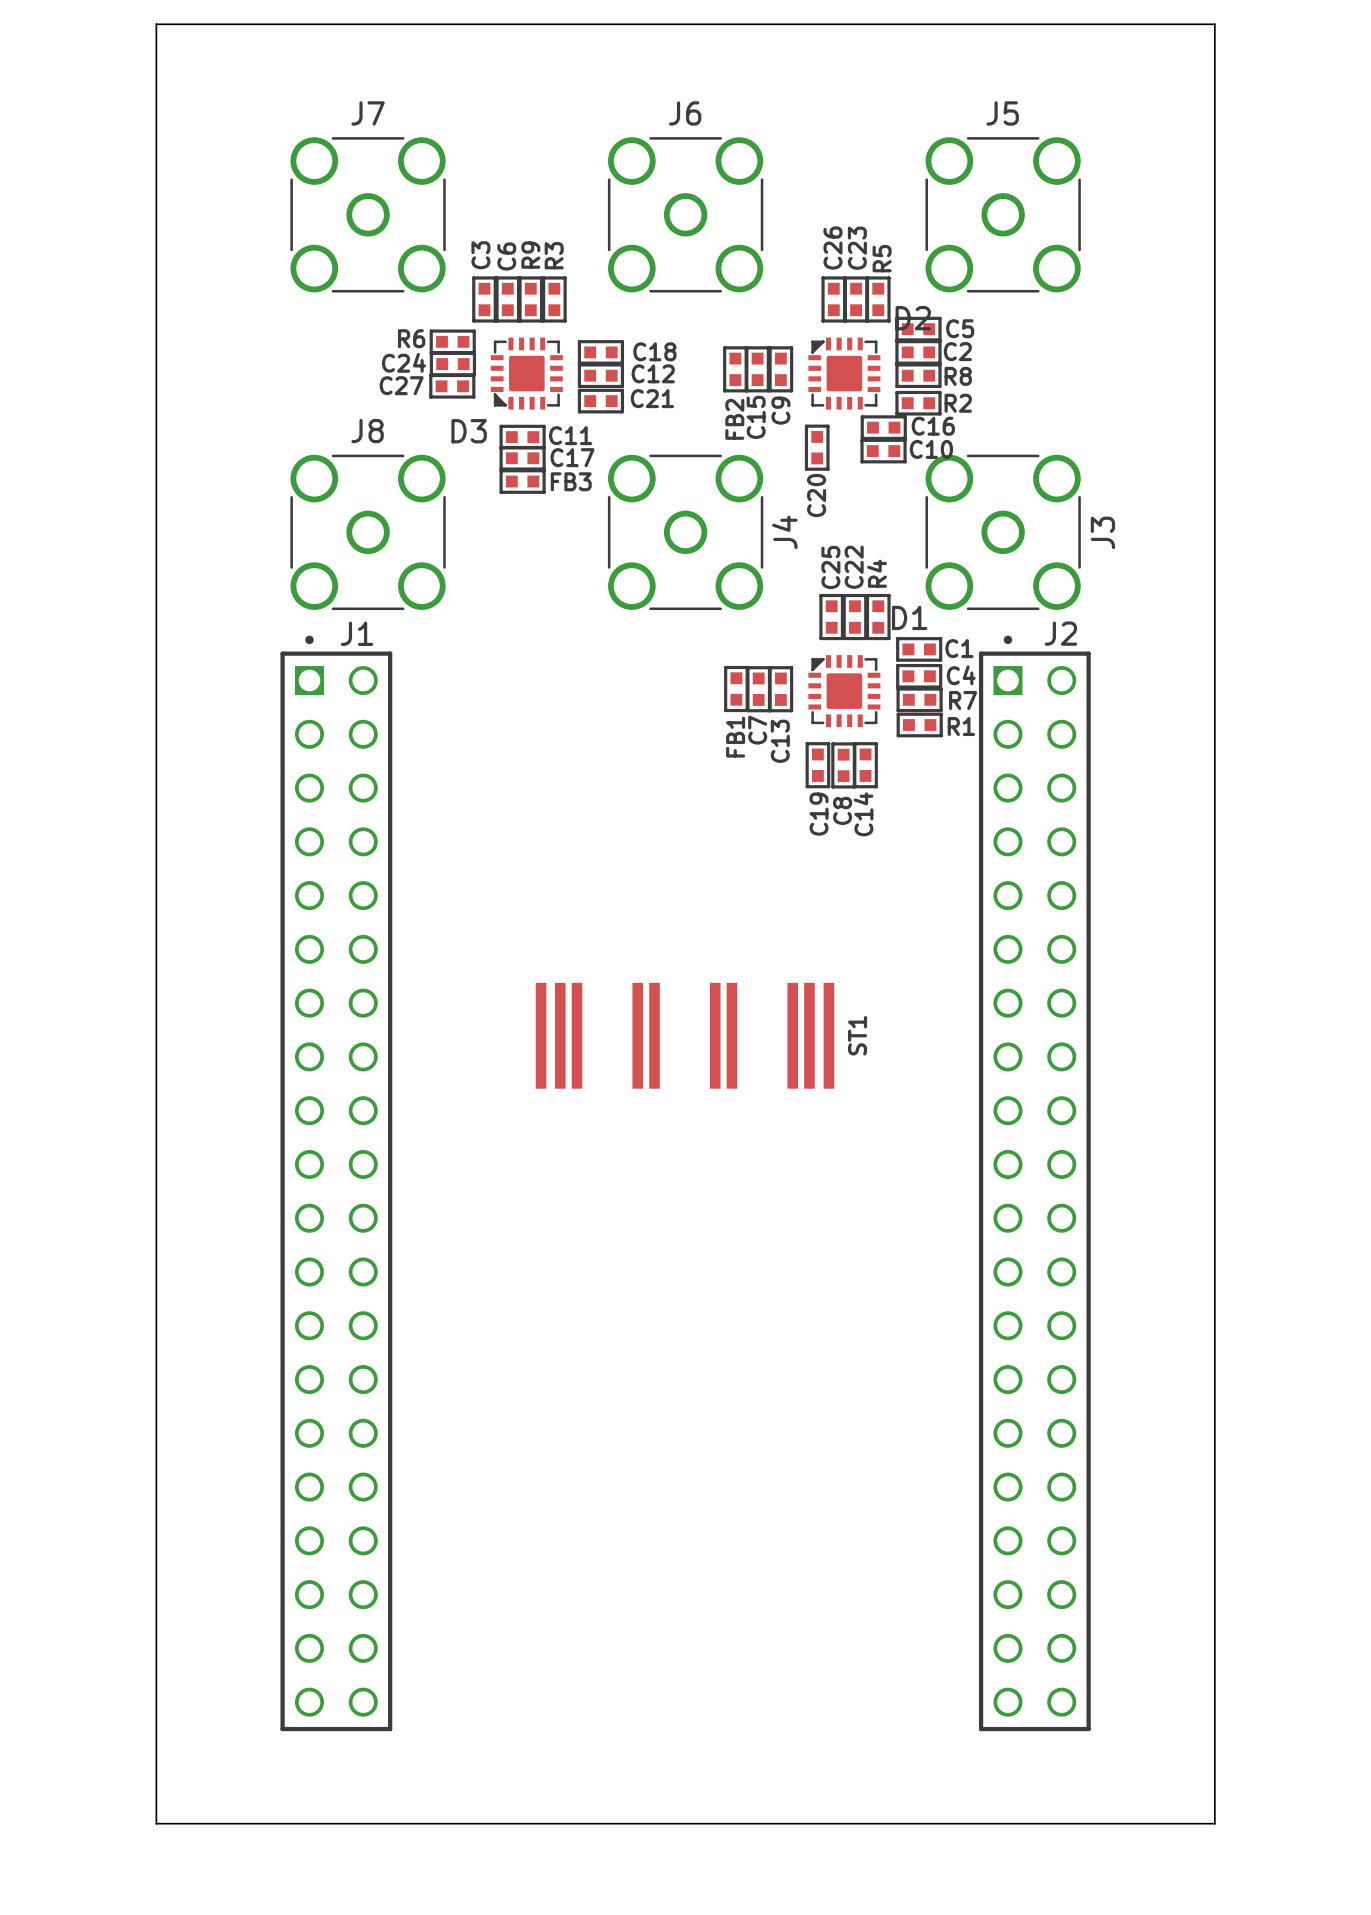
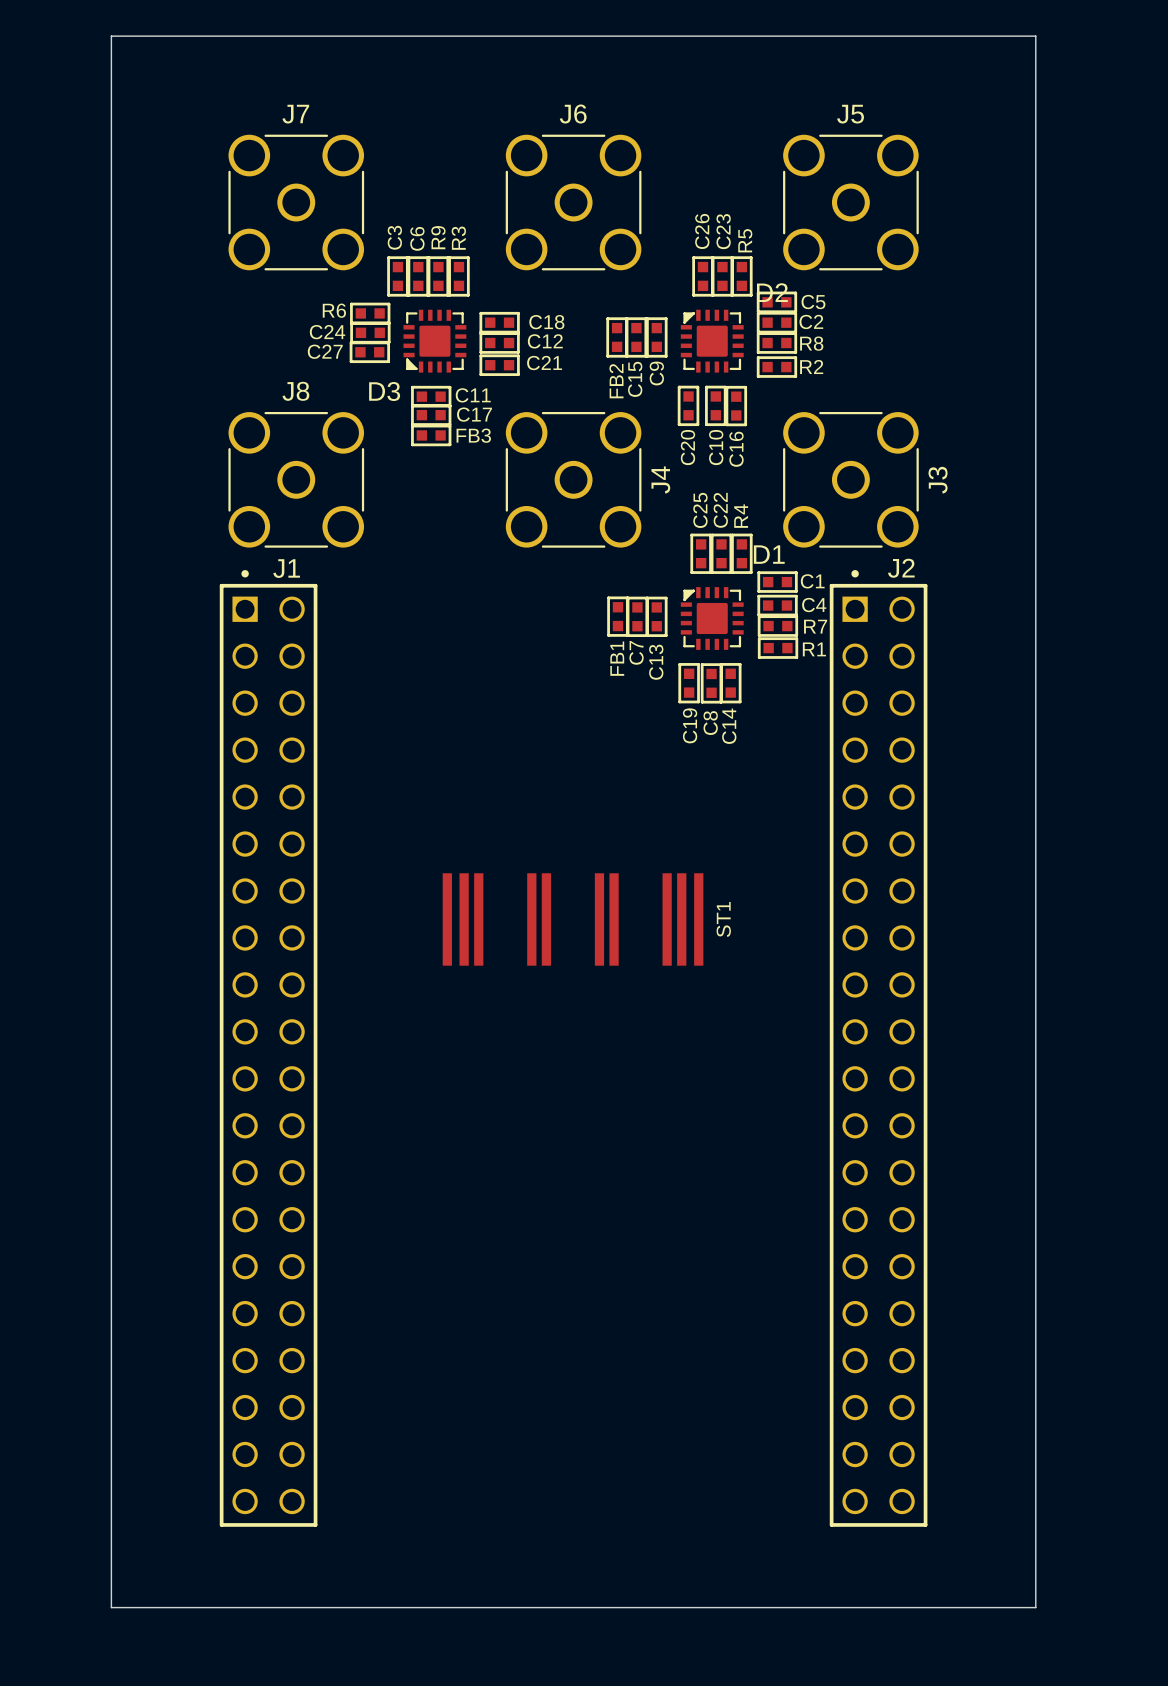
C16 rotation: 0° (883, 427) -> 90° clockwise (736, 406)
C10 rotation: 0° (883, 451) -> 90° clockwise (715, 405)
C10 position: (883, 451) -> (715, 405)

